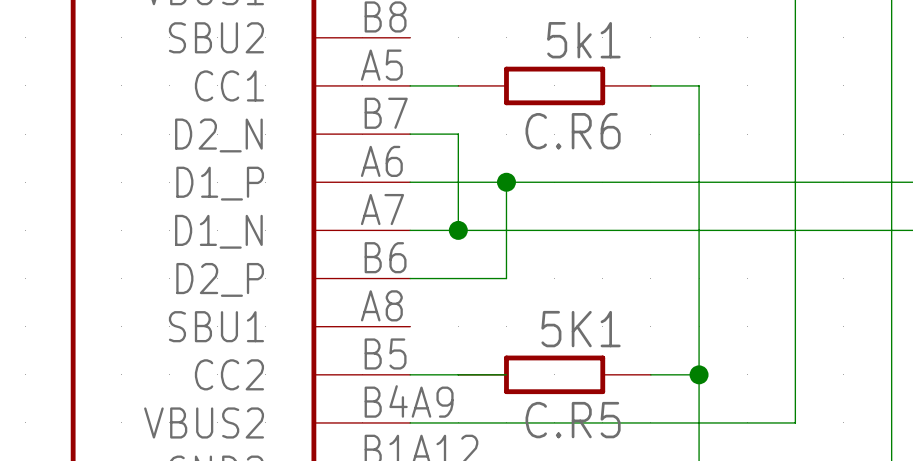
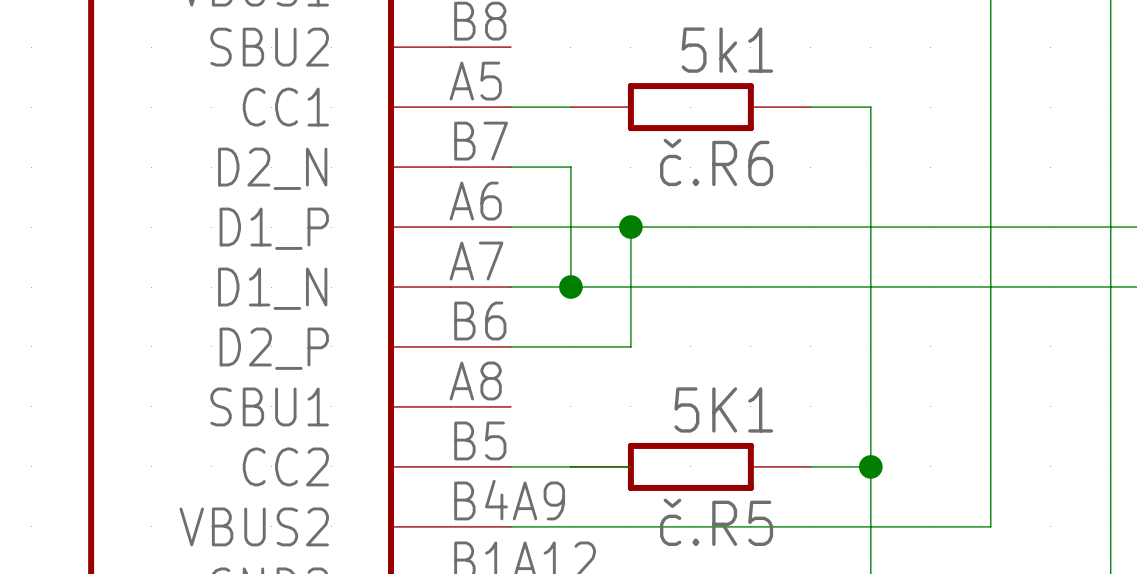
C.R6 name: C.R6 (573, 131) -> č.R6 (716, 162)
C.R5 name: C.R5 (573, 420) -> č.R5 (716, 522)

